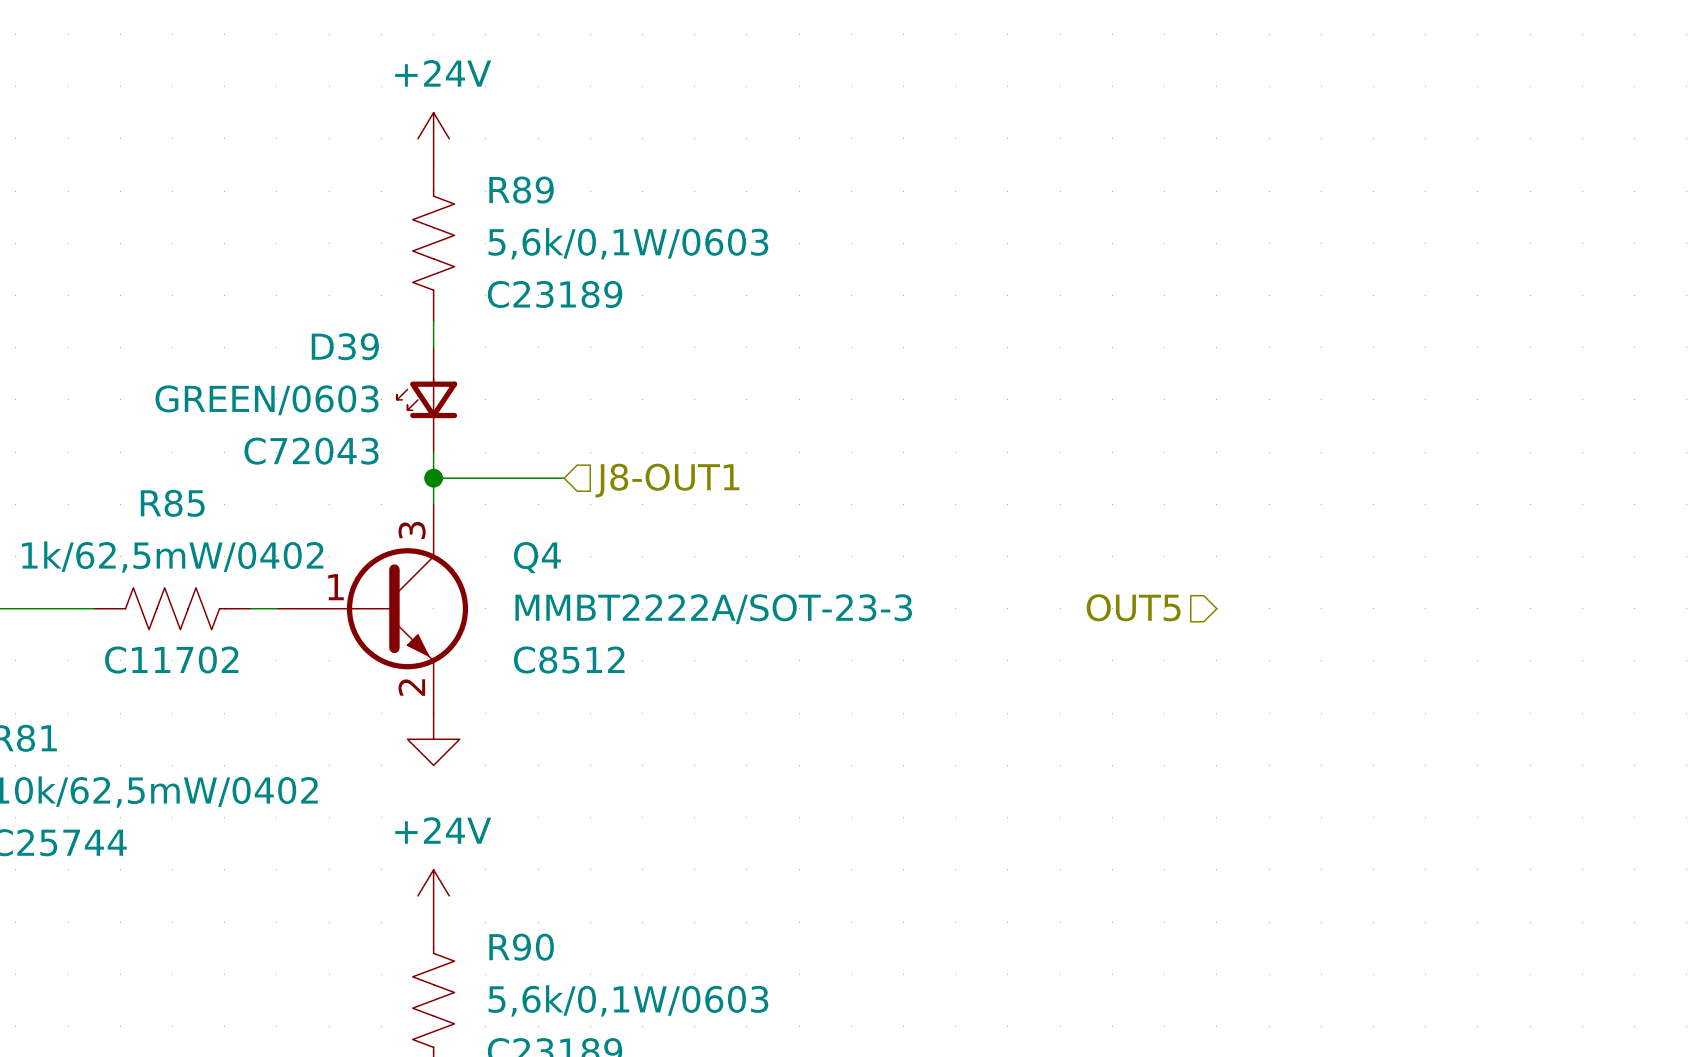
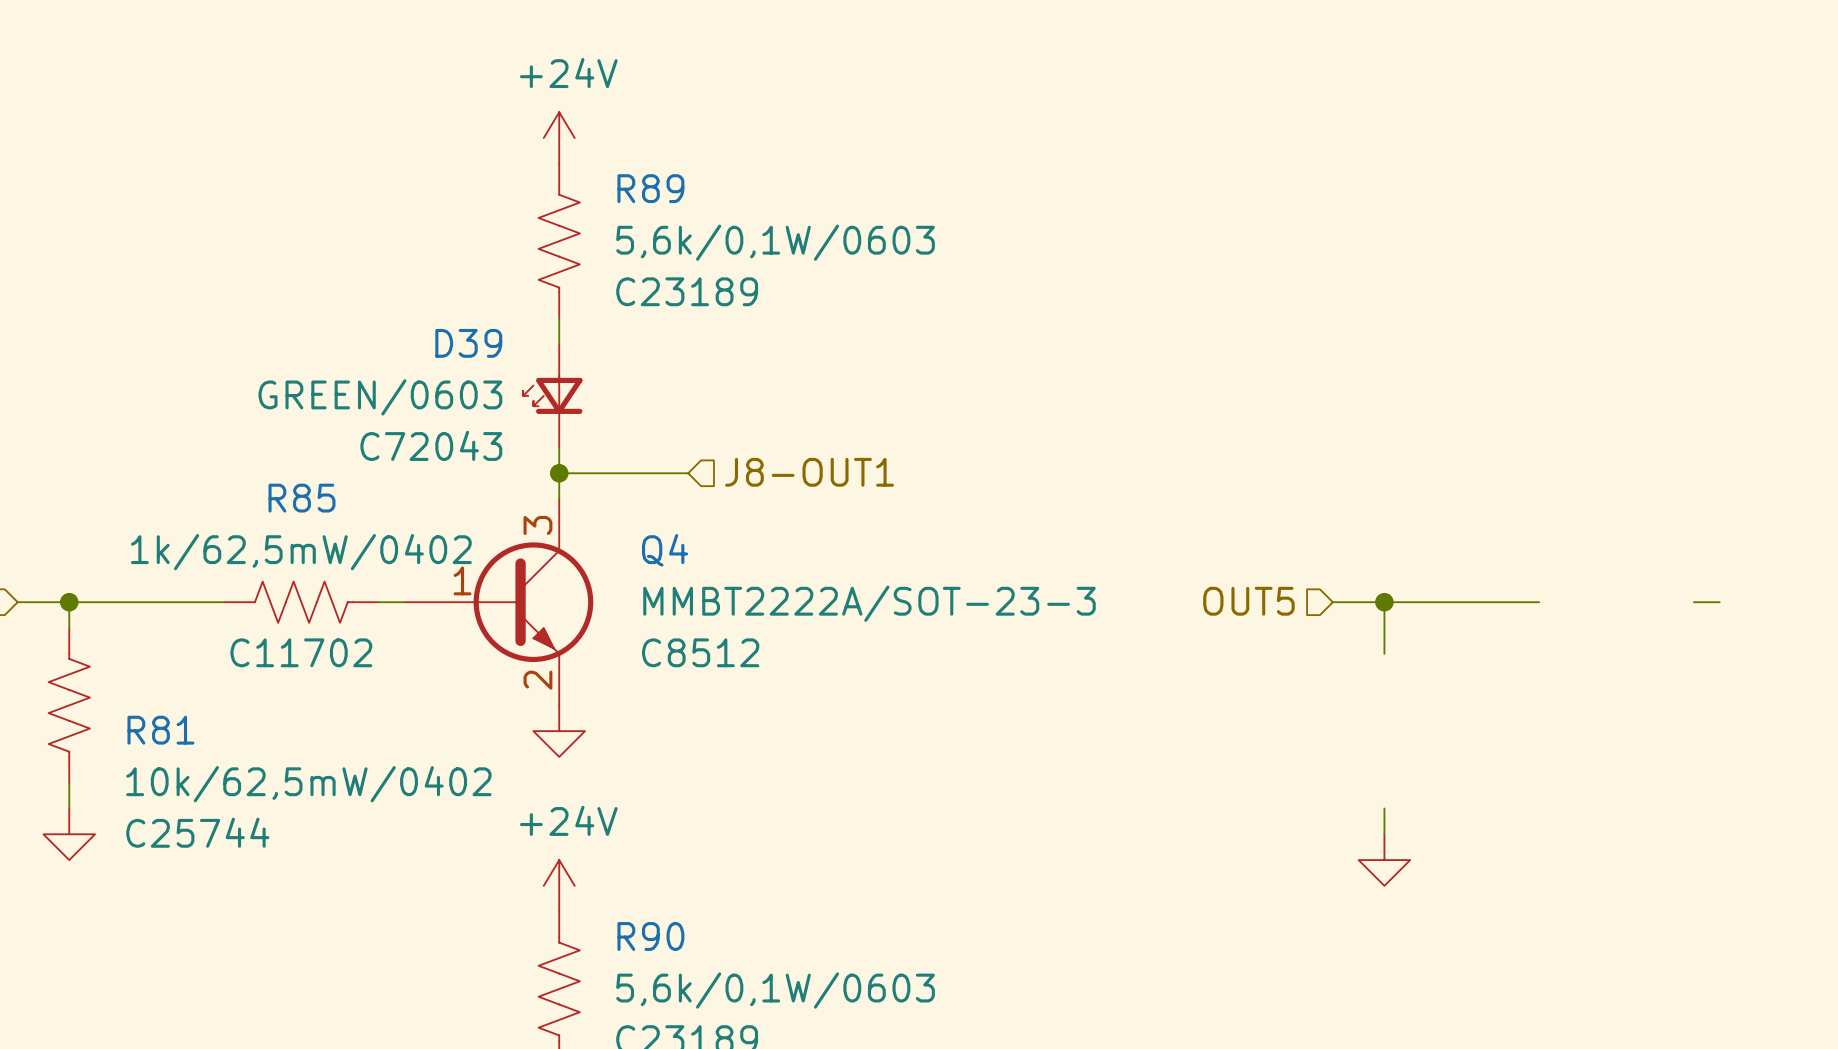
wire: none -> (1332, 602) (1539, 602)
wire: none -> (1384, 602) (1384, 653)
junction: none -> (1384, 602)
wire: none -> (1693, 602) (1719, 602)
wire: none -> (1384, 808) (1384, 834)
power symbol: none -> (1384, 860)

